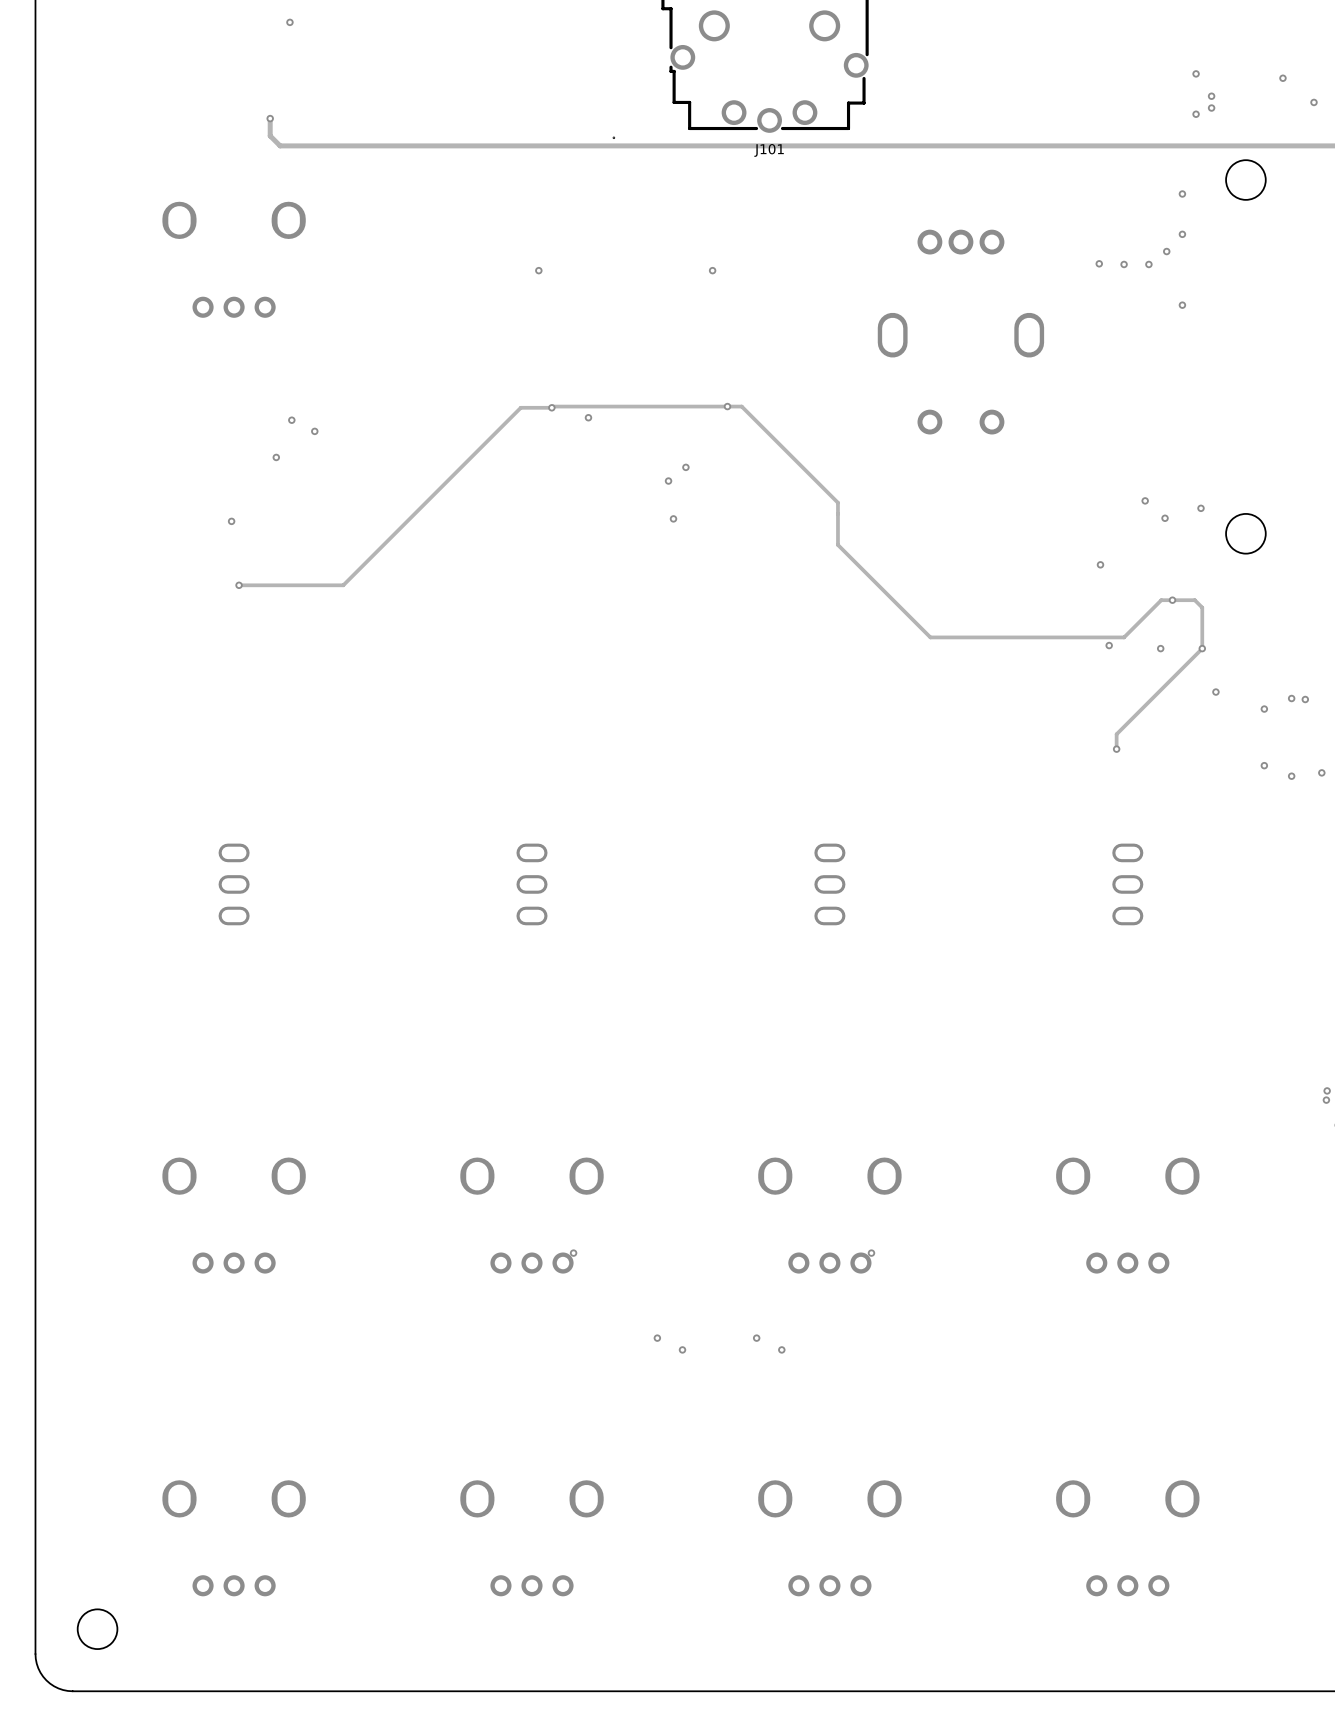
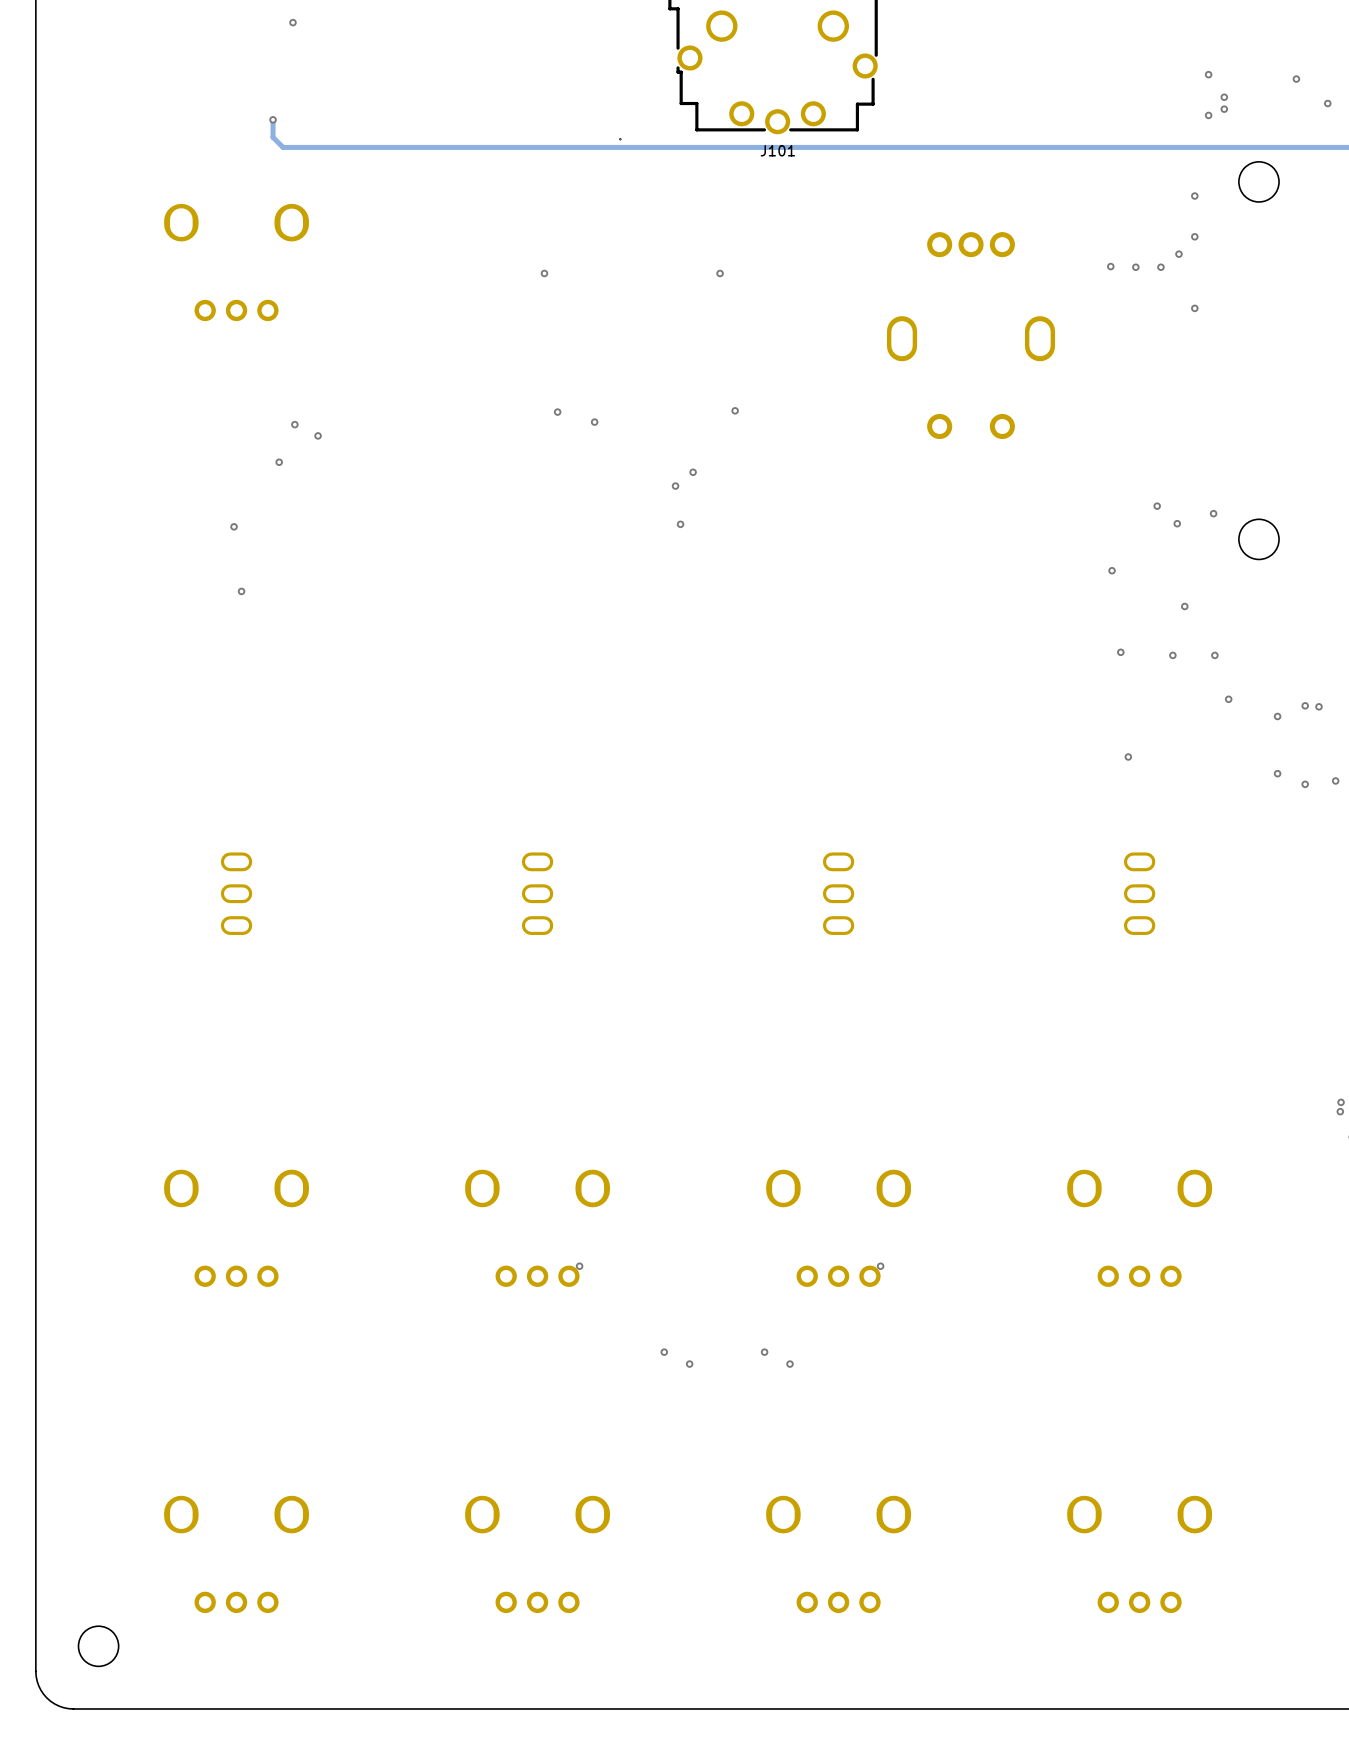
track: (239, 585) (343, 585) (520, 407) (741, 406) (837, 502) (837, 544) (930, 637) (1124, 637) (1161, 600) (1194, 600) (1202, 607) (1202, 648) (1116, 734) (1116, 749) -> none

